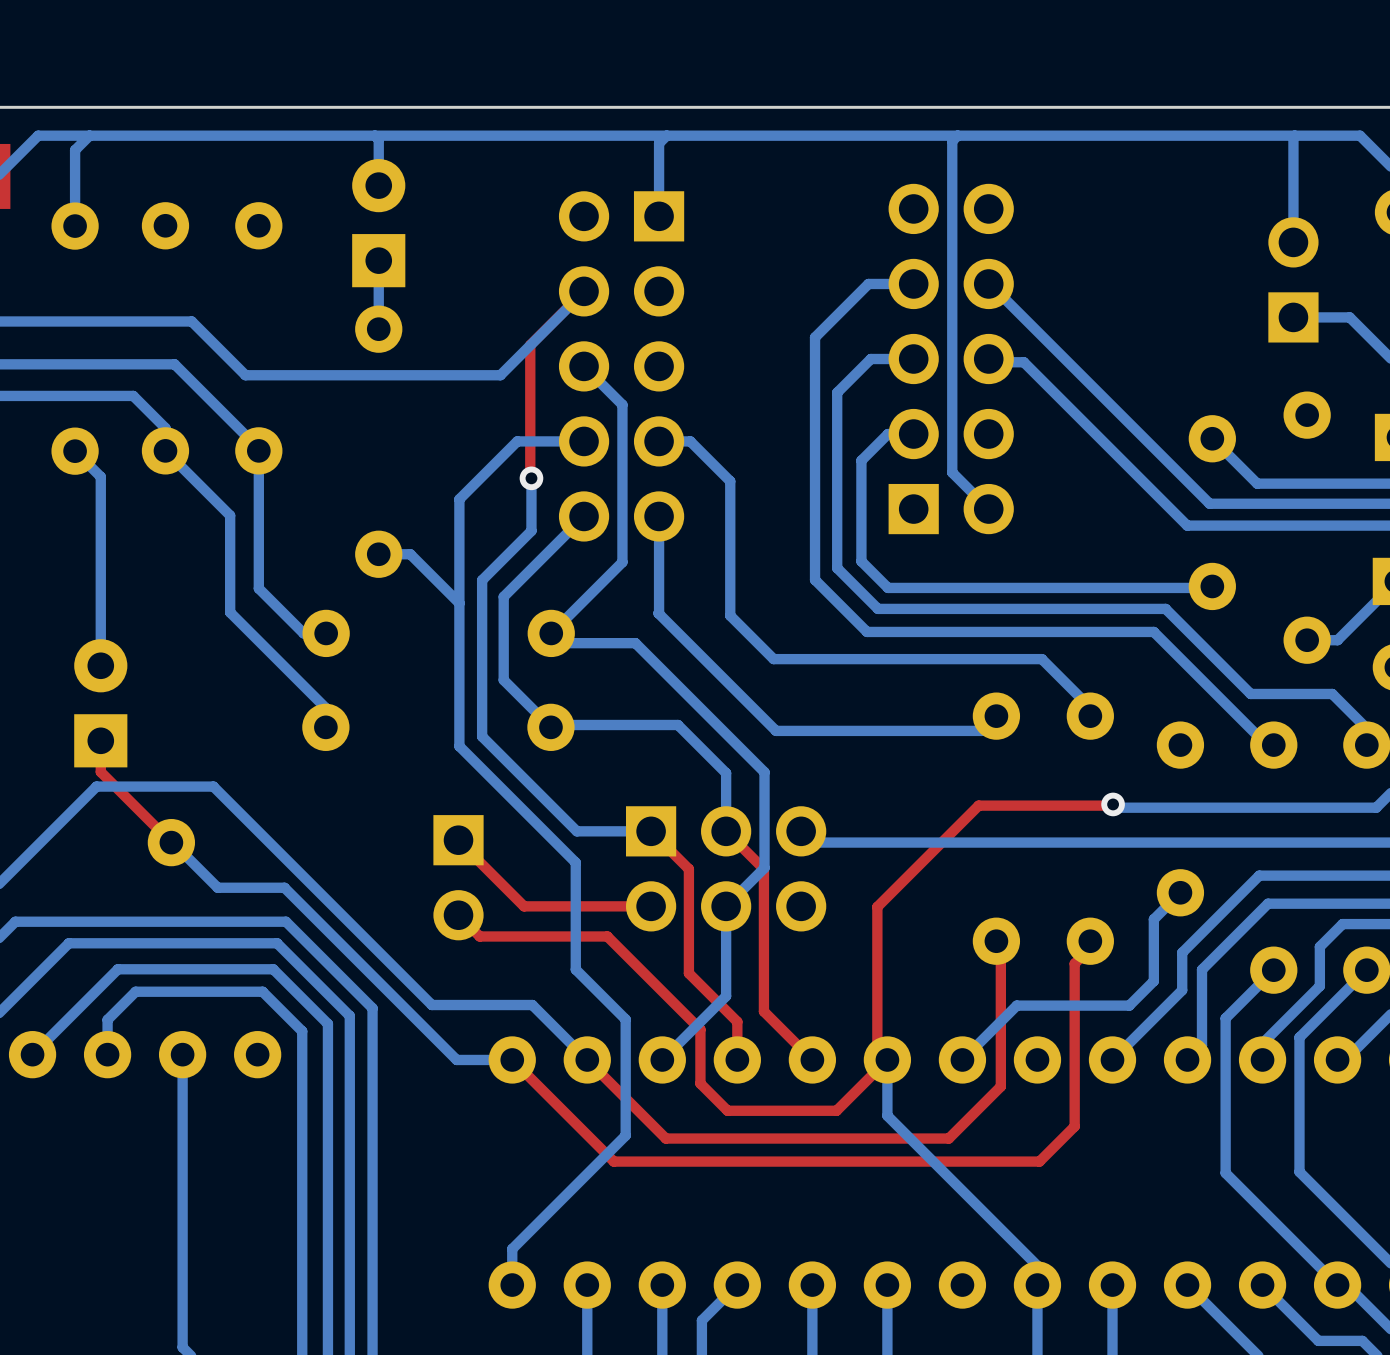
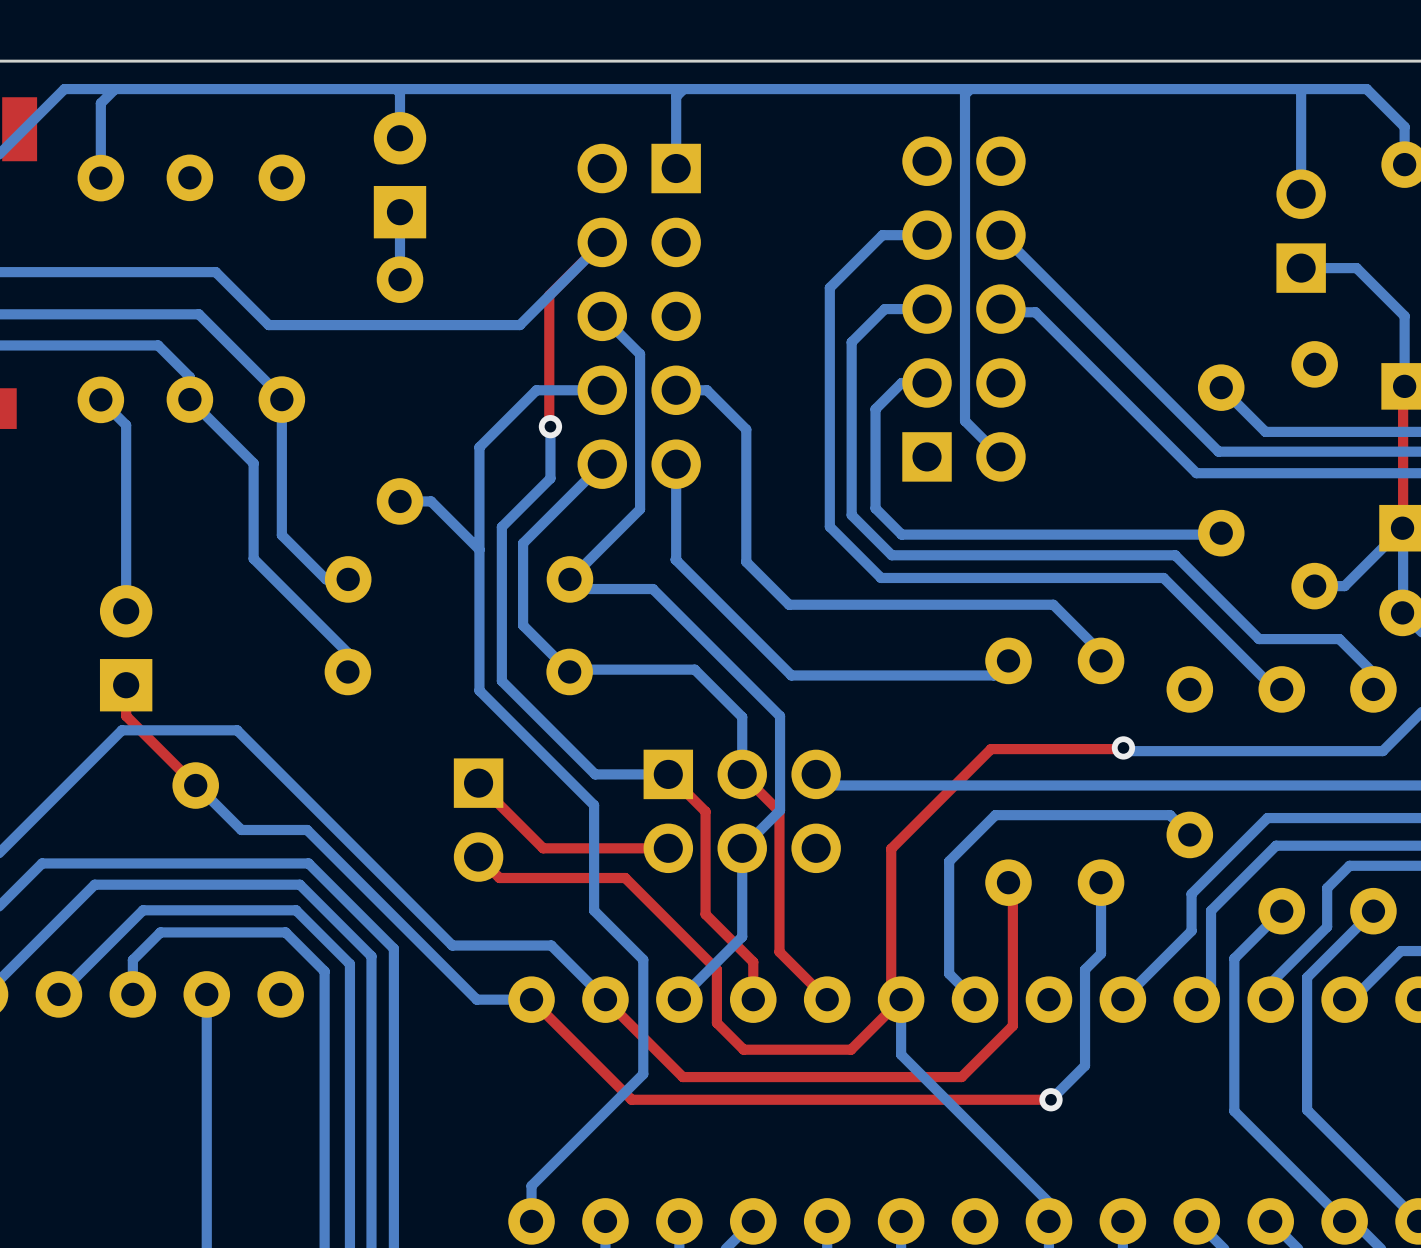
bottom track: (1180, 892) (1153, 919) (1153, 981) (1129, 1005) (1016, 1005) (962, 1059) -> (1189, 834) (1170, 815) (995, 815) (949, 861) (949, 973) (975, 999)
bottom track: none -> (1101, 882) (1101, 953) (1085, 969) (1085, 1065) (1050, 1099)
top track: (1087, 950) (1074, 963) (1074, 1126) (1039, 1161) -> none
via: none -> (1050, 1099)

